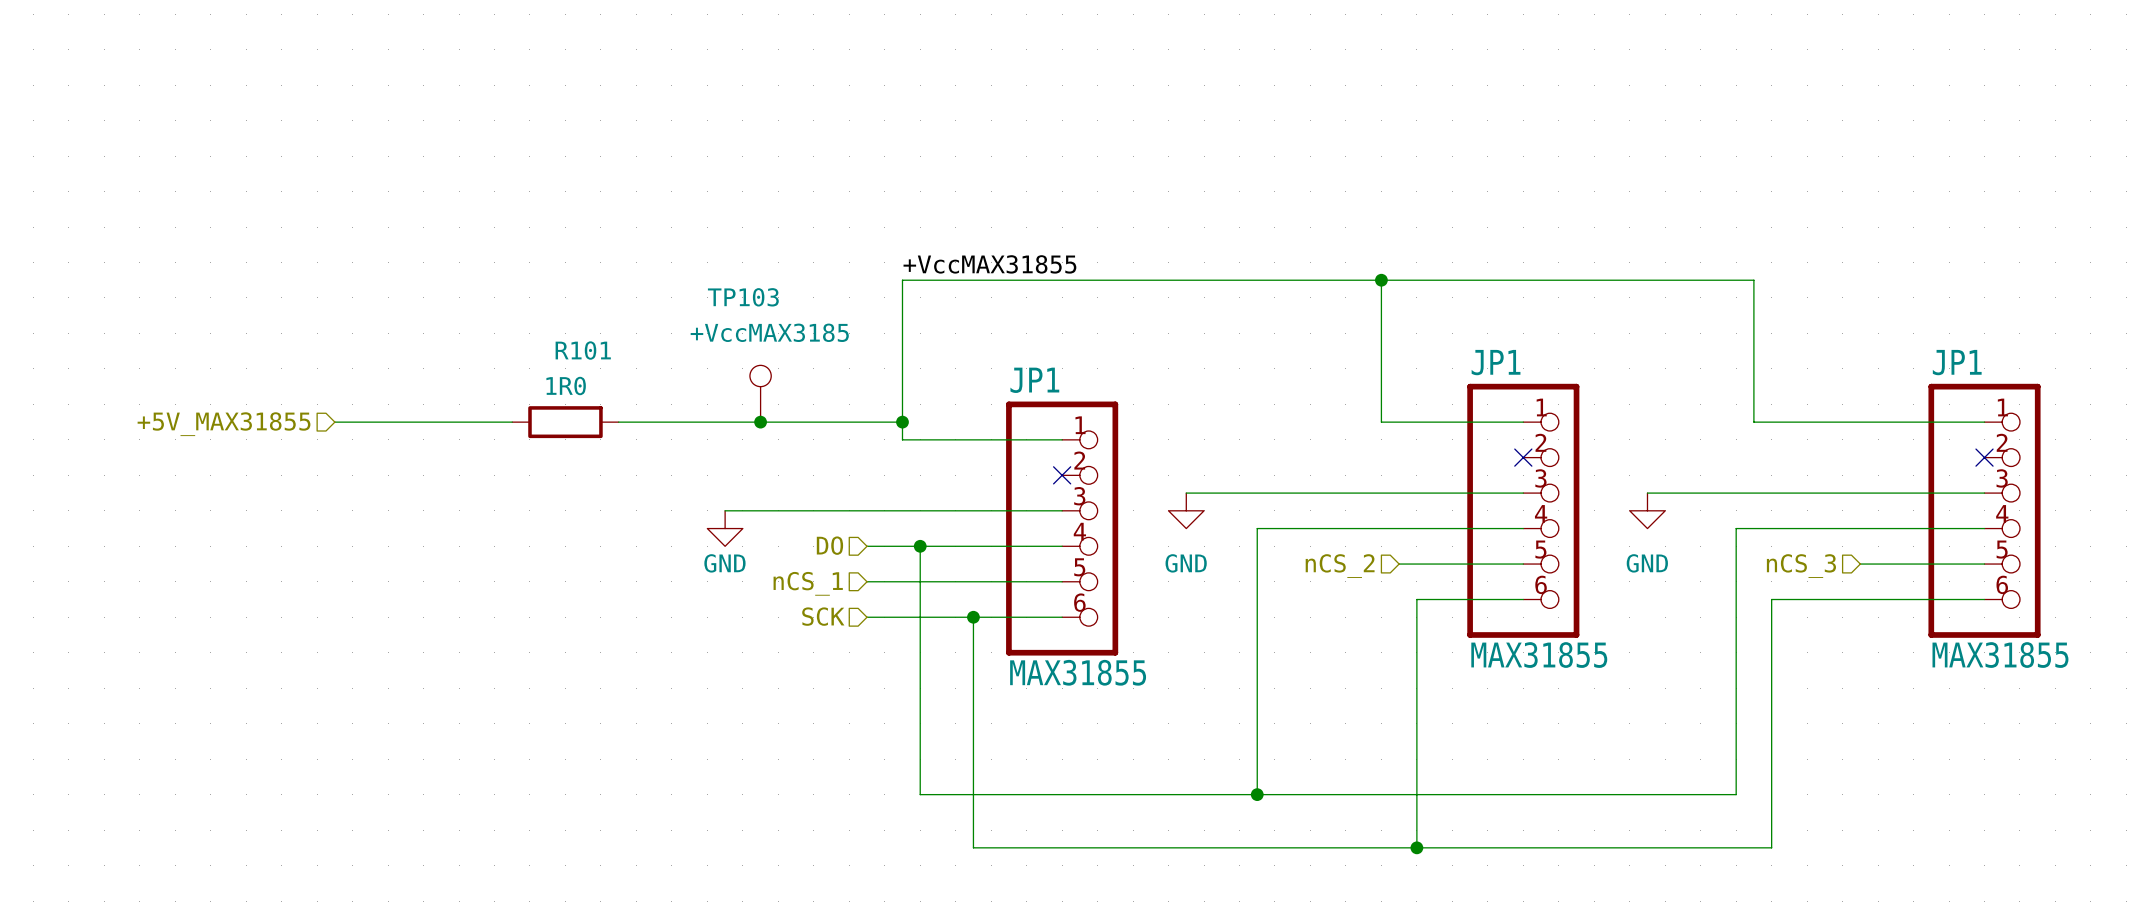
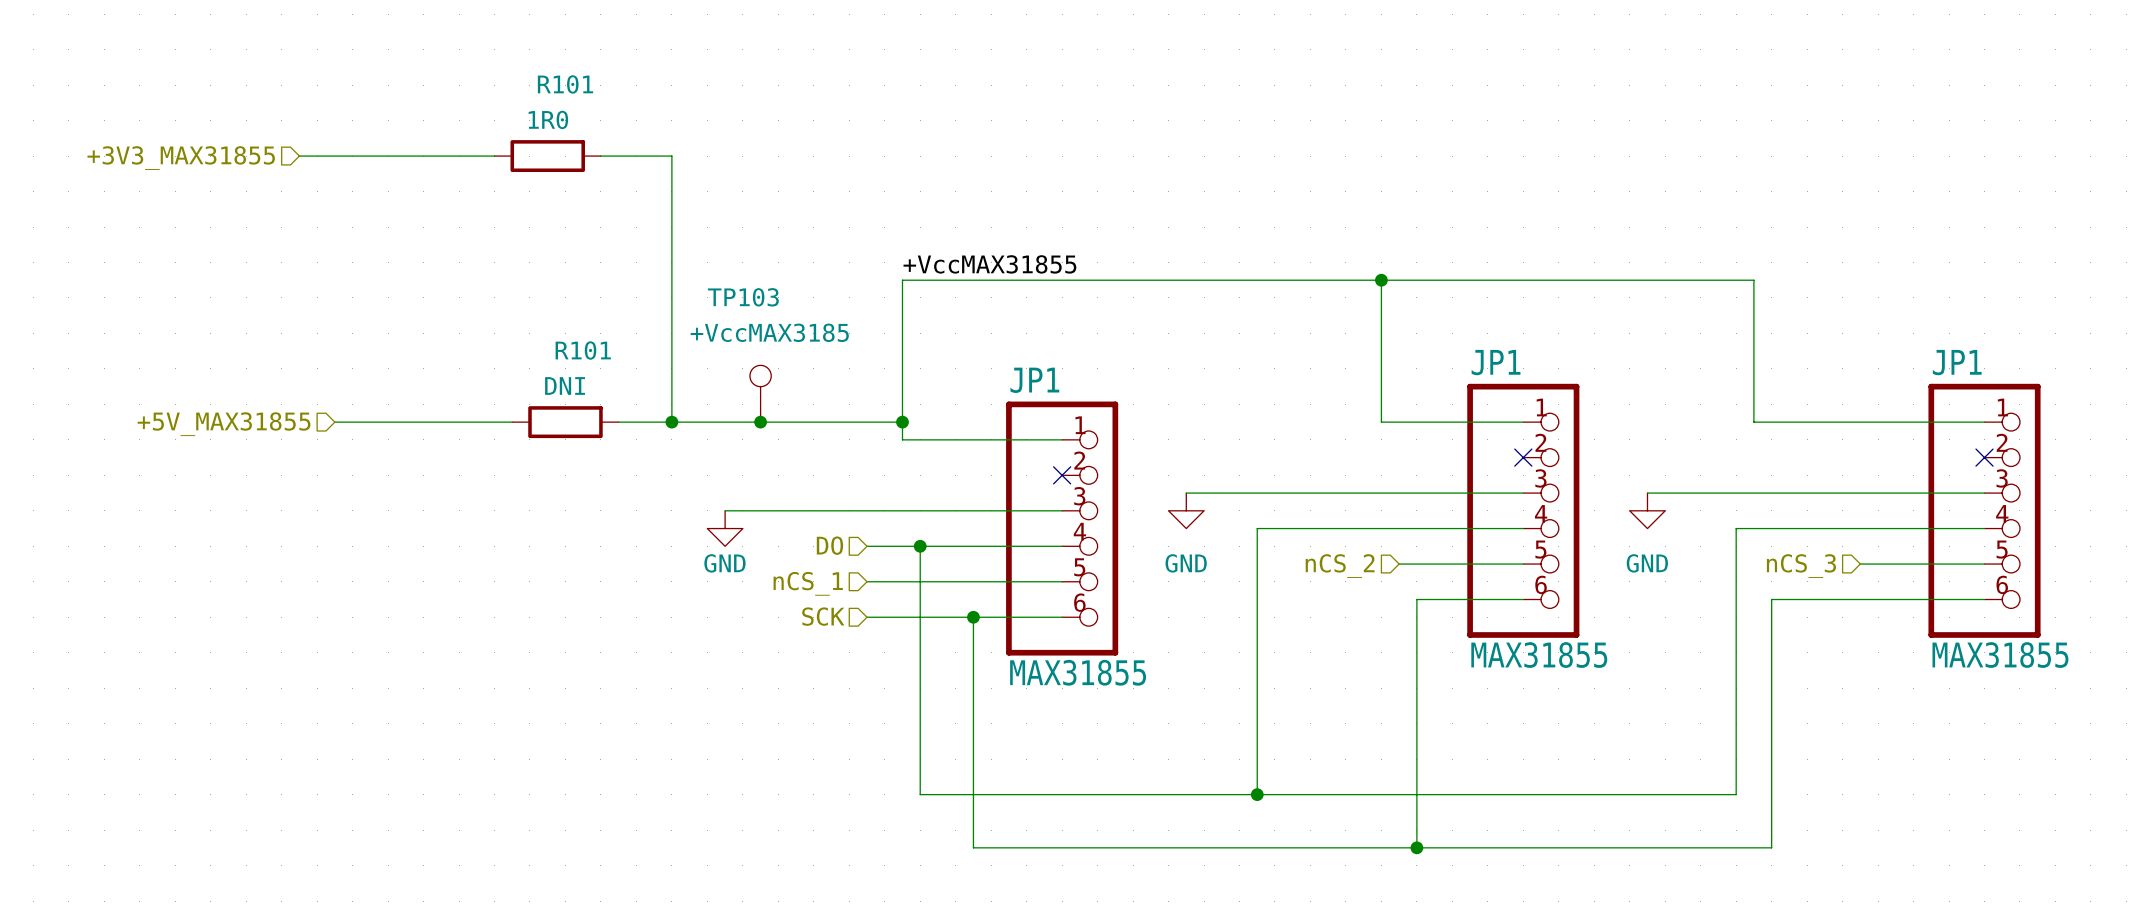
wire: none -> (299, 156) (494, 156)
R101: none -> 1R0 (547, 156)
wire: none -> (600, 156) (671, 156) (671, 422)
hierarchical label: none -> +3V3_MAX31855 (181, 158)
R101 value: 1R0 (566, 386) -> DNI (565, 385)
junction: none -> (671, 422)

